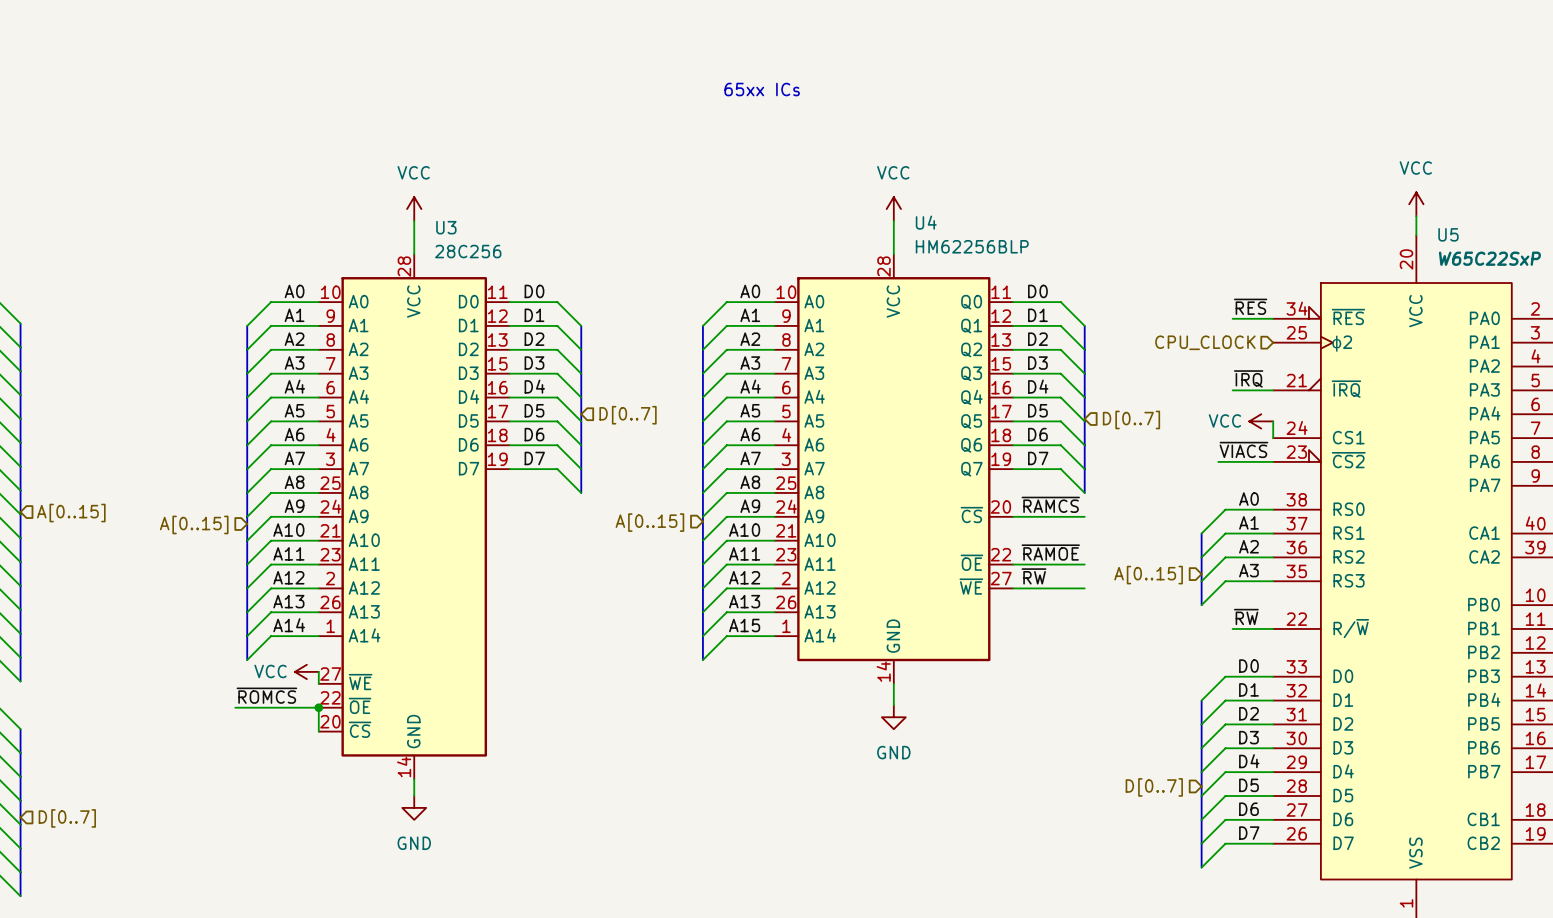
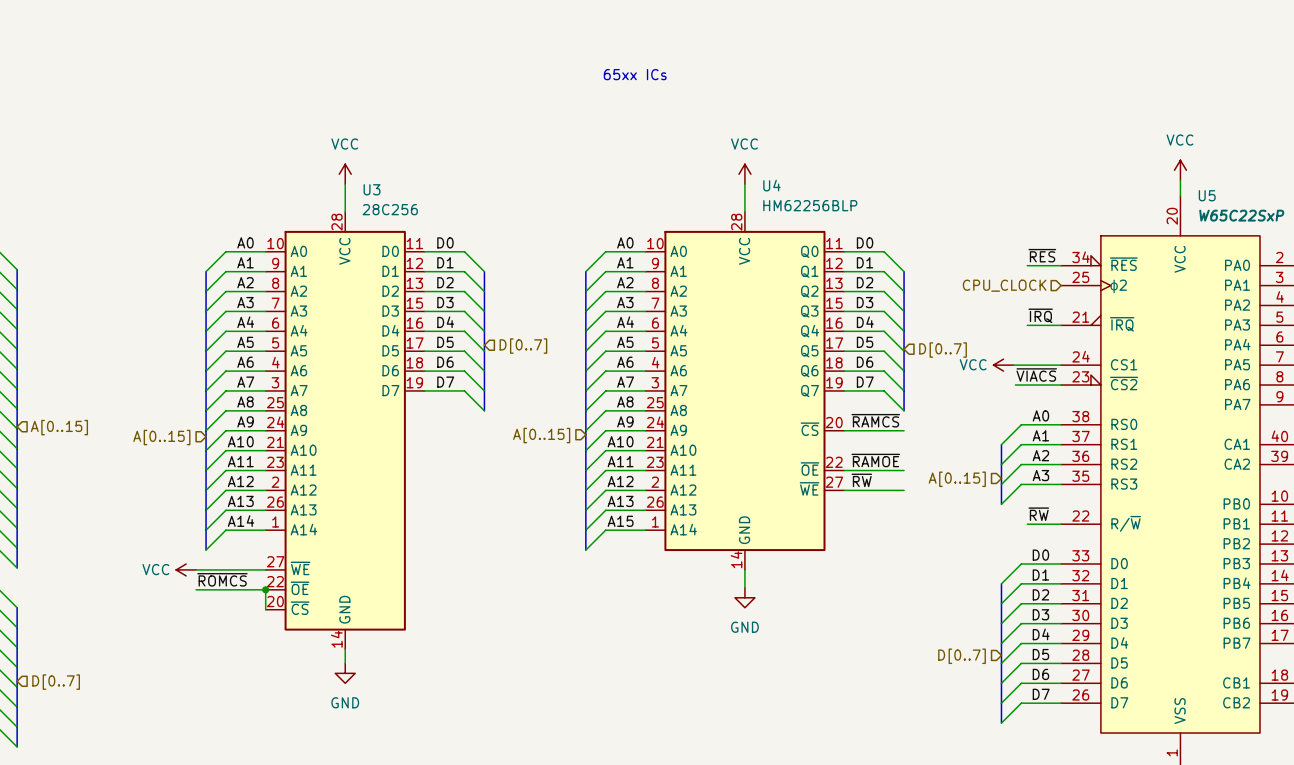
power symbol position: VCC (1261, 421) -> VCC (1003, 365)
wire: (1273, 421) (1273, 438) -> (1013, 365) (1061, 365)
power symbol position: VCC (306, 671) -> VCC (186, 569)
wire: (318, 671) (318, 683) -> (196, 569) (265, 569)

